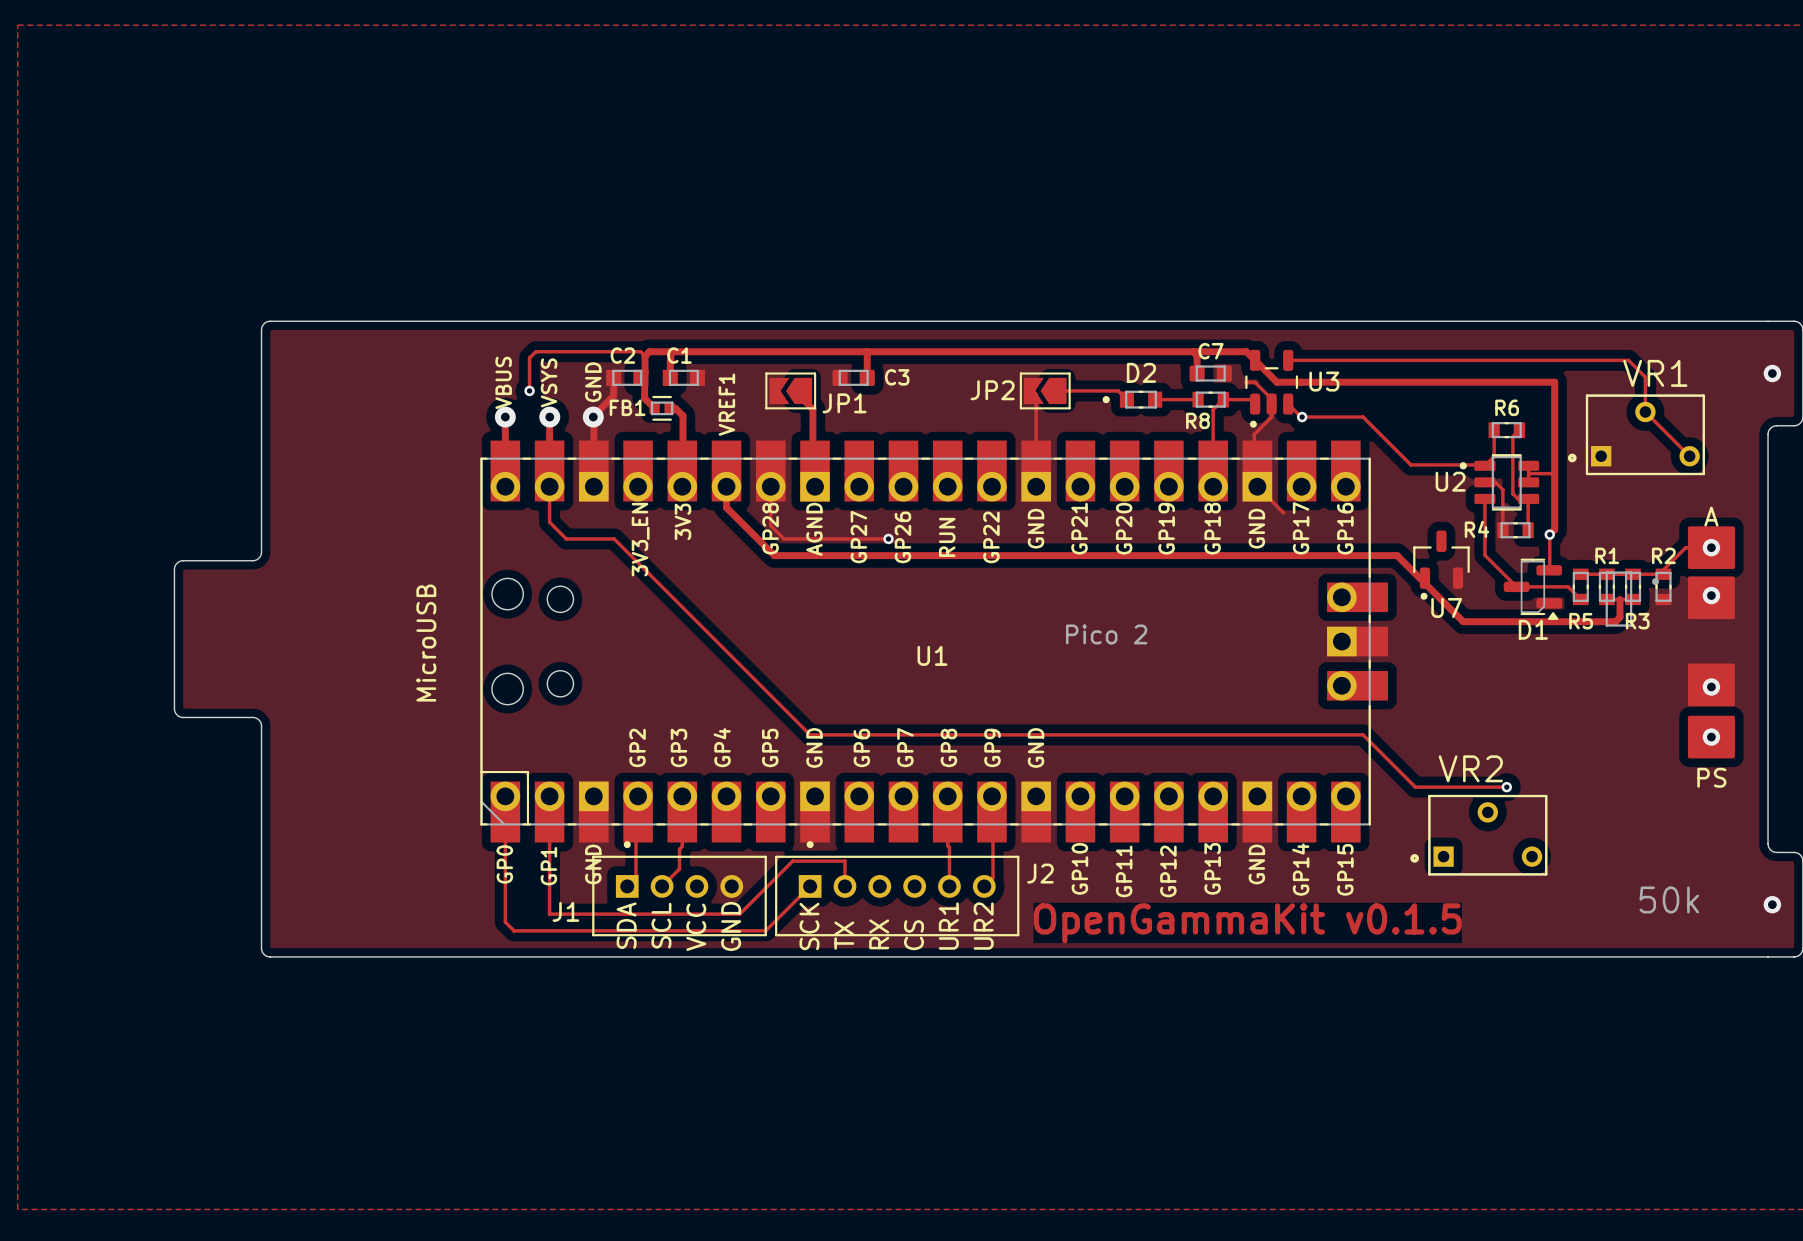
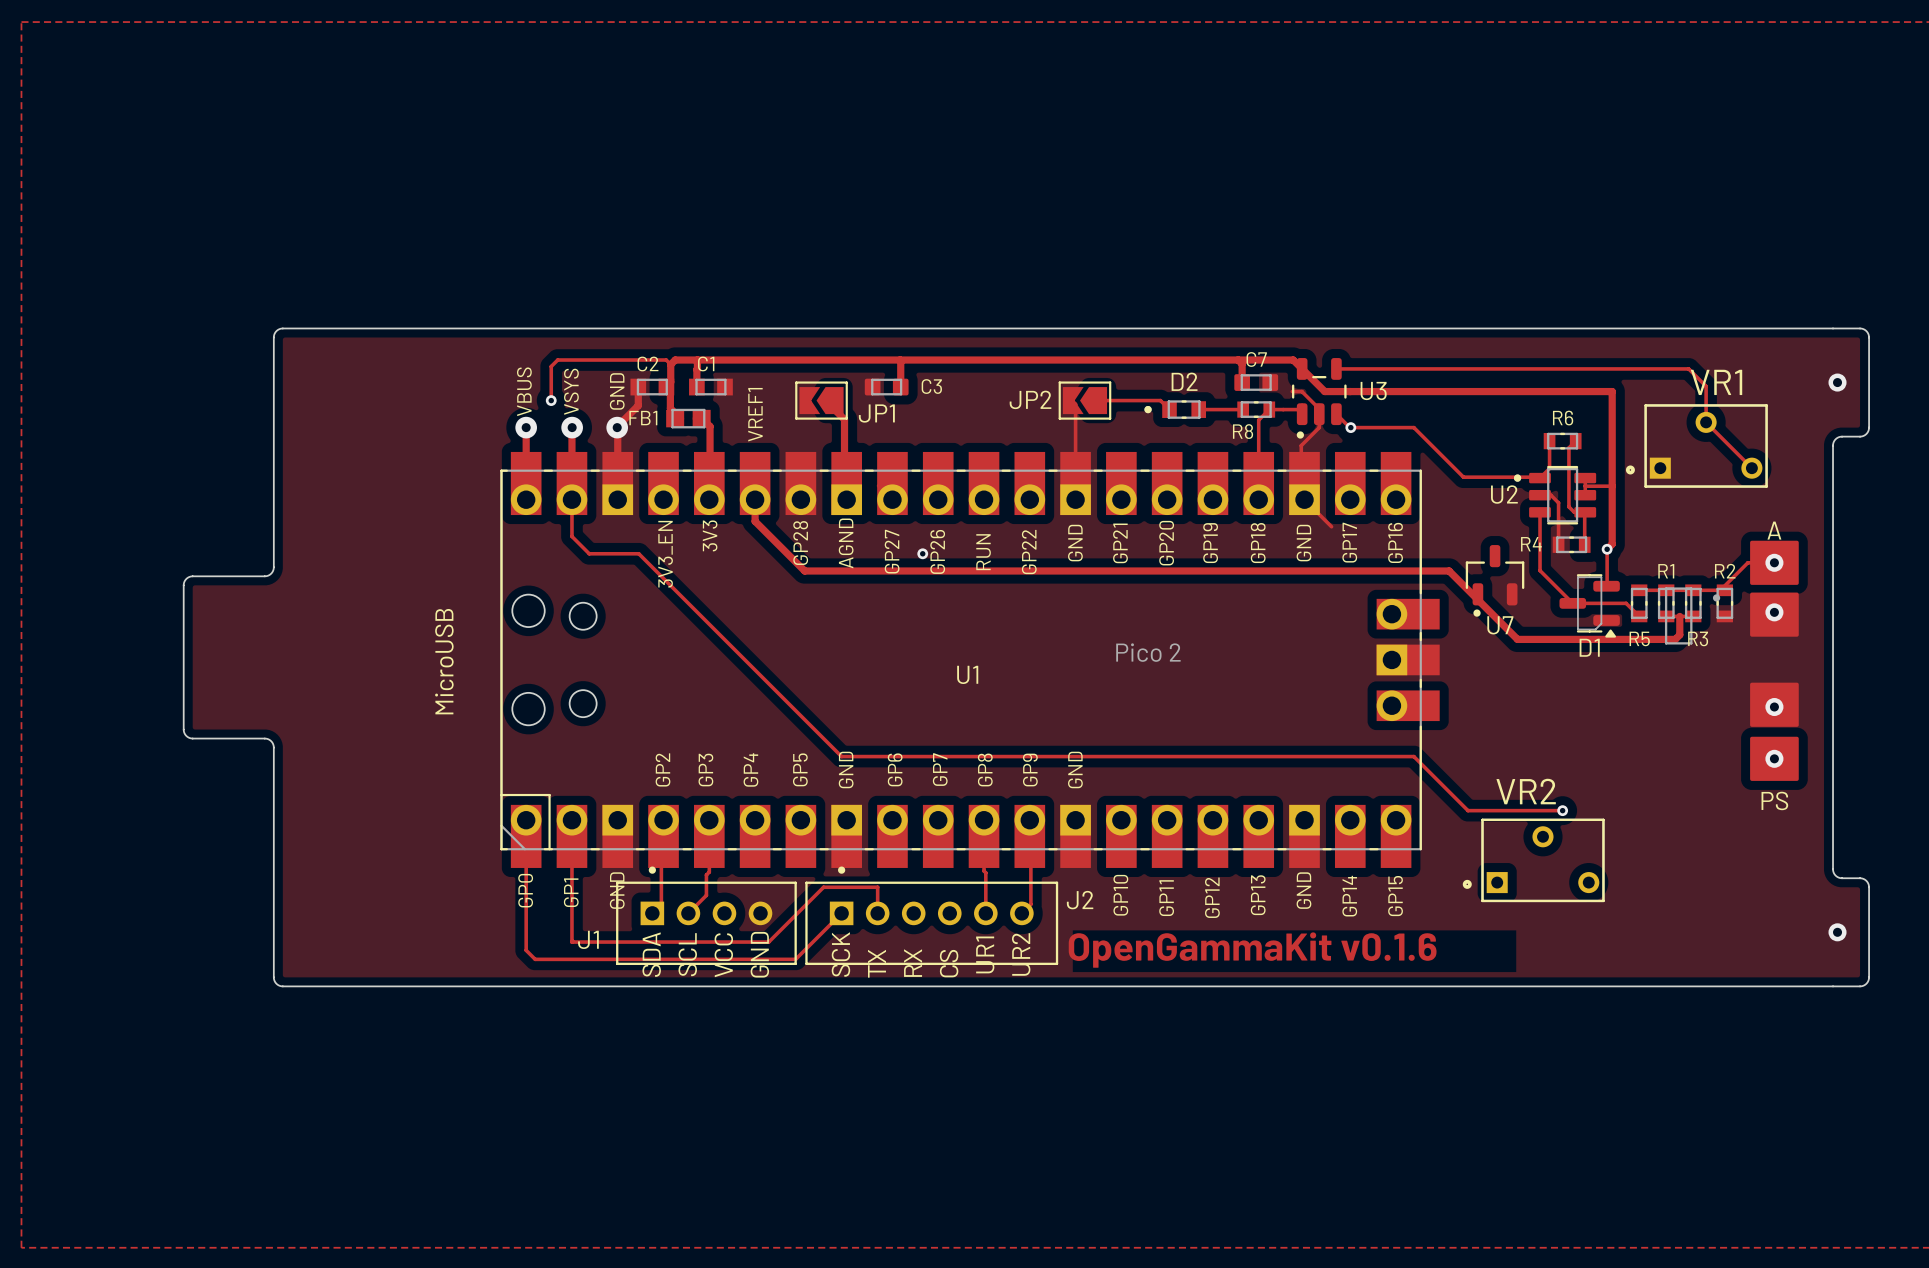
FB1 footprint: [649, 395, 675, 421] -> [666, 408, 711, 429]
track: (770, 486) (770, 525) (784, 538) (888, 538) -> none
VR2 value: 50k (1669, 899) -> none
text: OpenGammaKit v0.1.5 (1247, 923) -> OpenGammaKit v0.1.6 (1252, 950)

